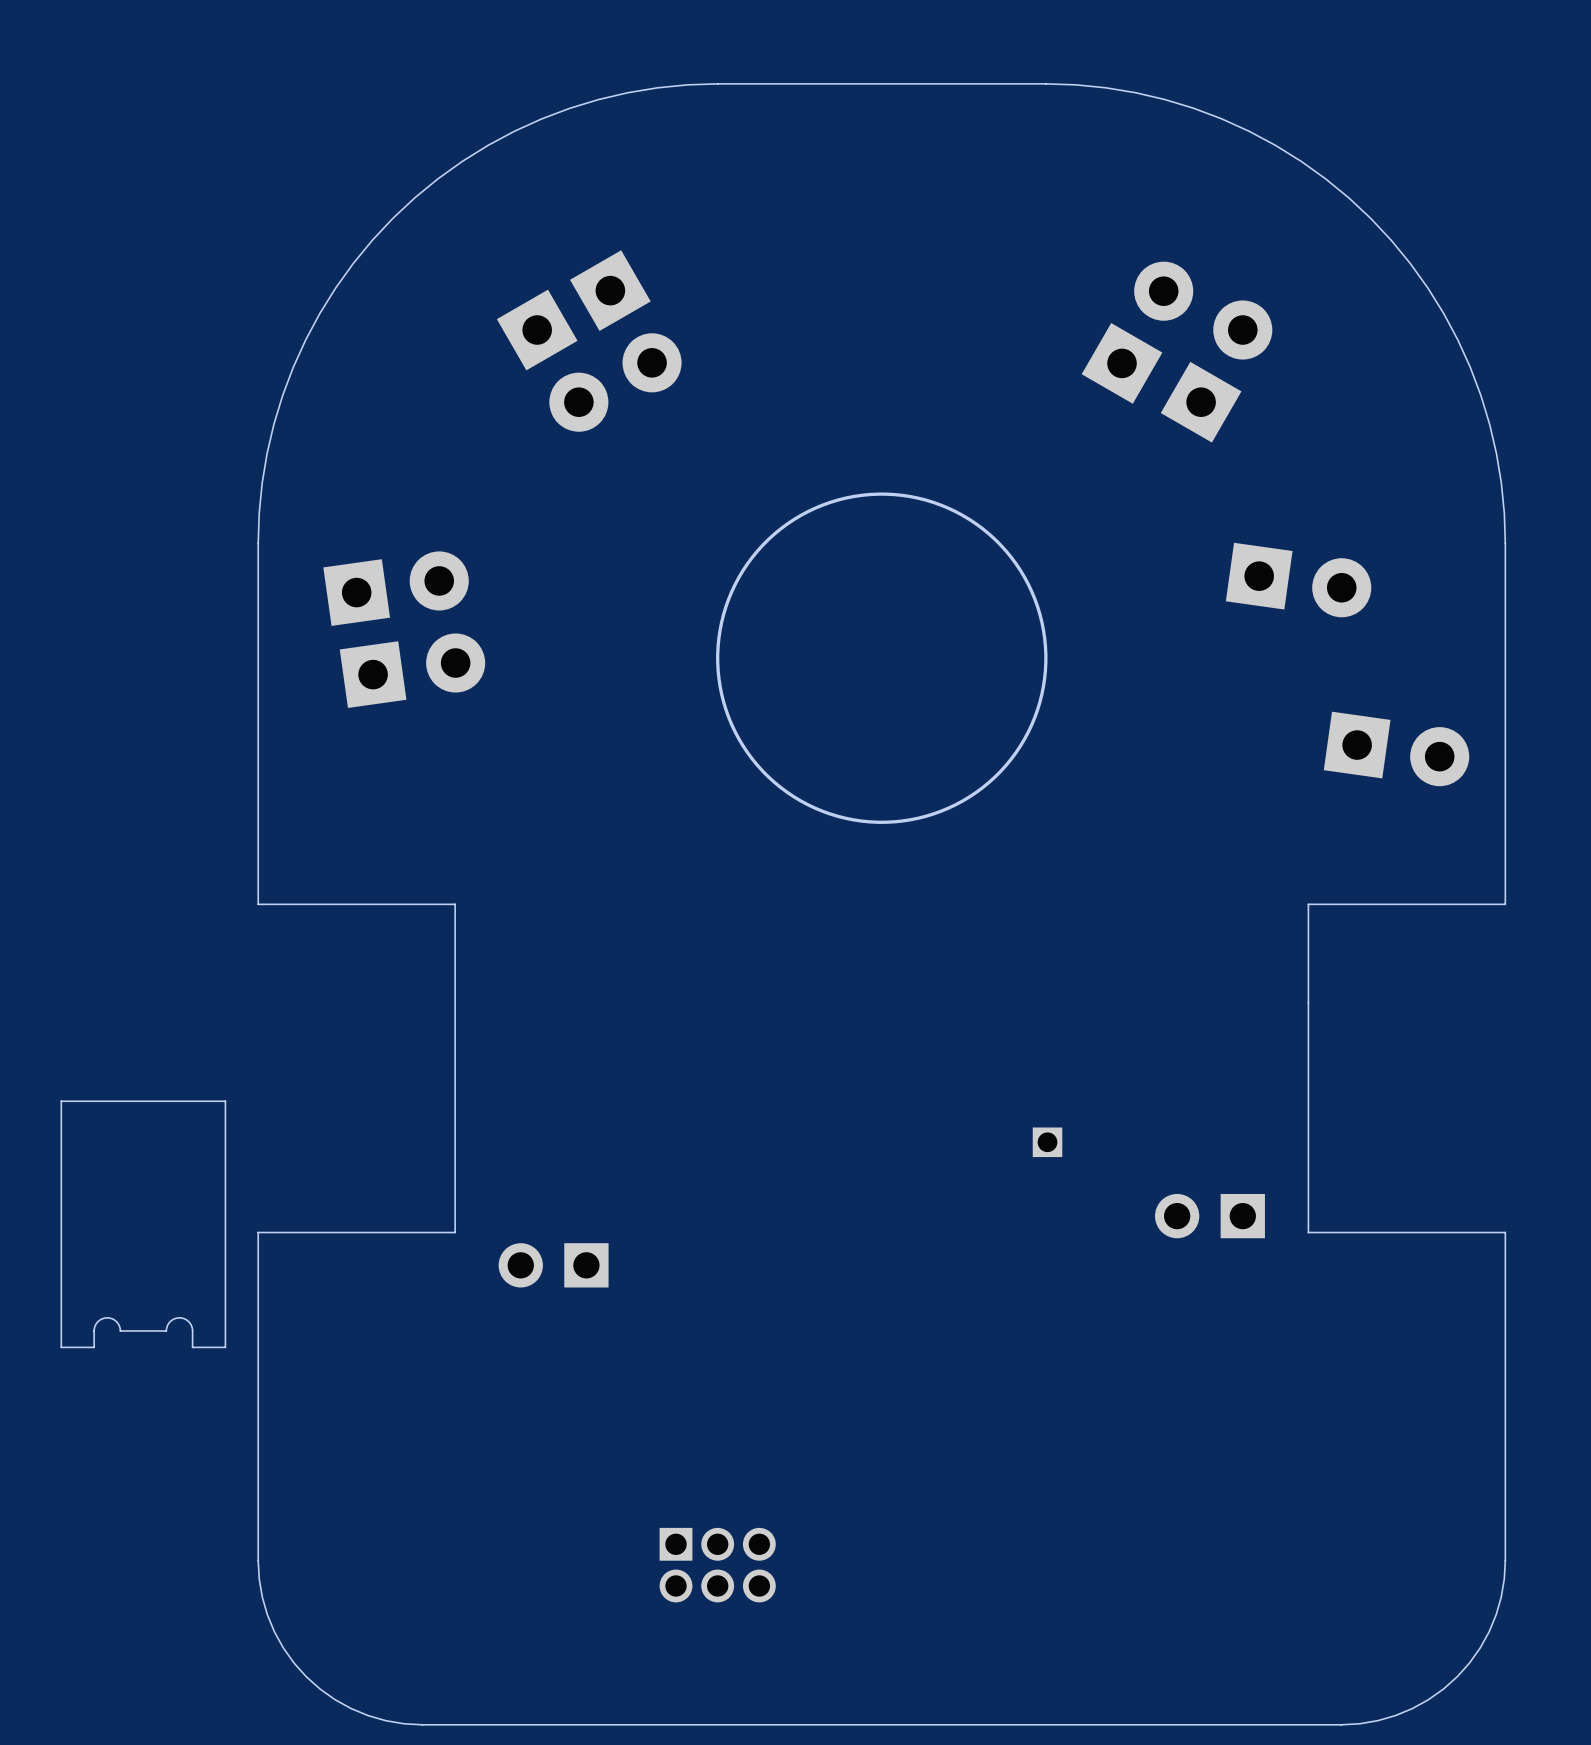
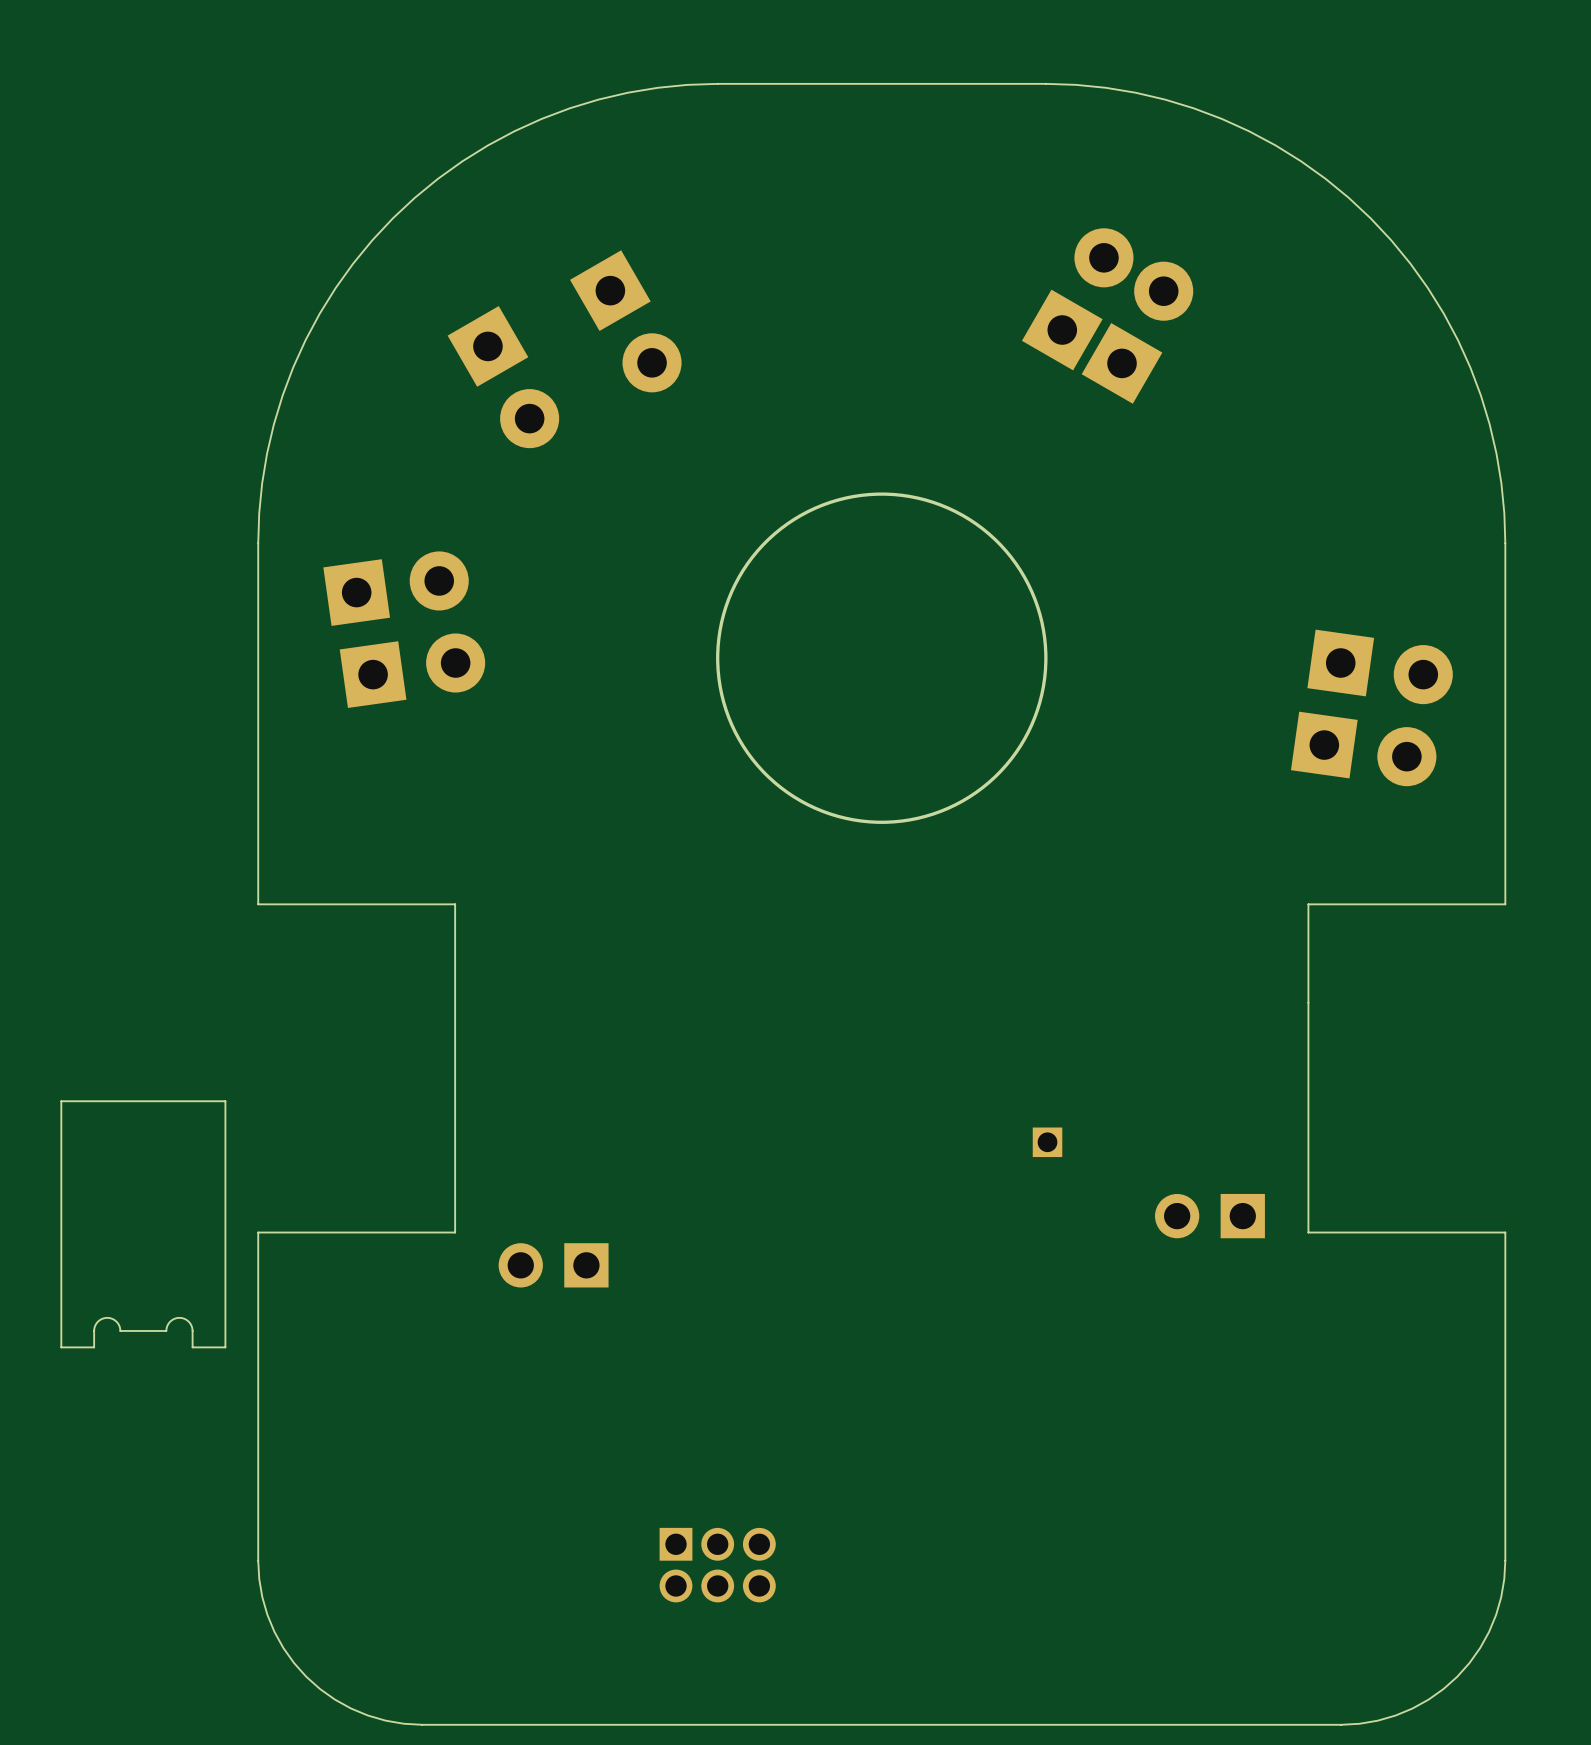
part position: (552, 360) -> (503, 377)
part position: (1216, 371) -> (1077, 299)
part position: (1298, 580) -> (1380, 666)
part position: (1396, 748) -> (1363, 748)

